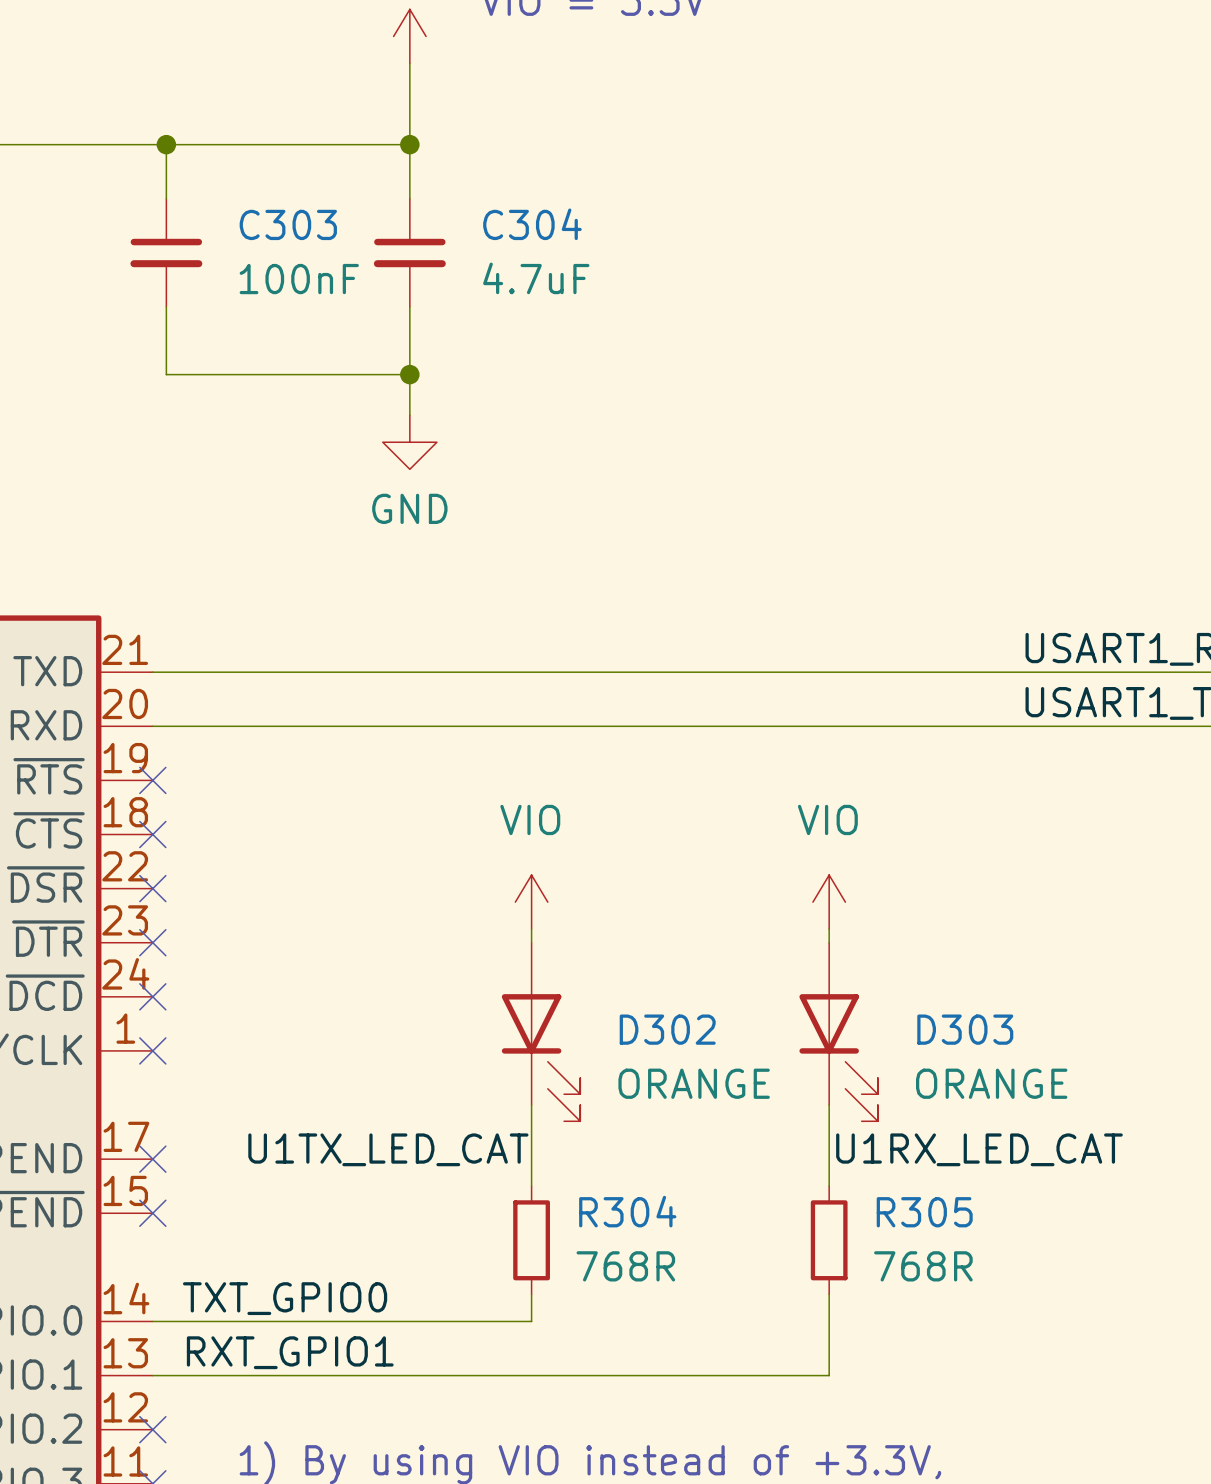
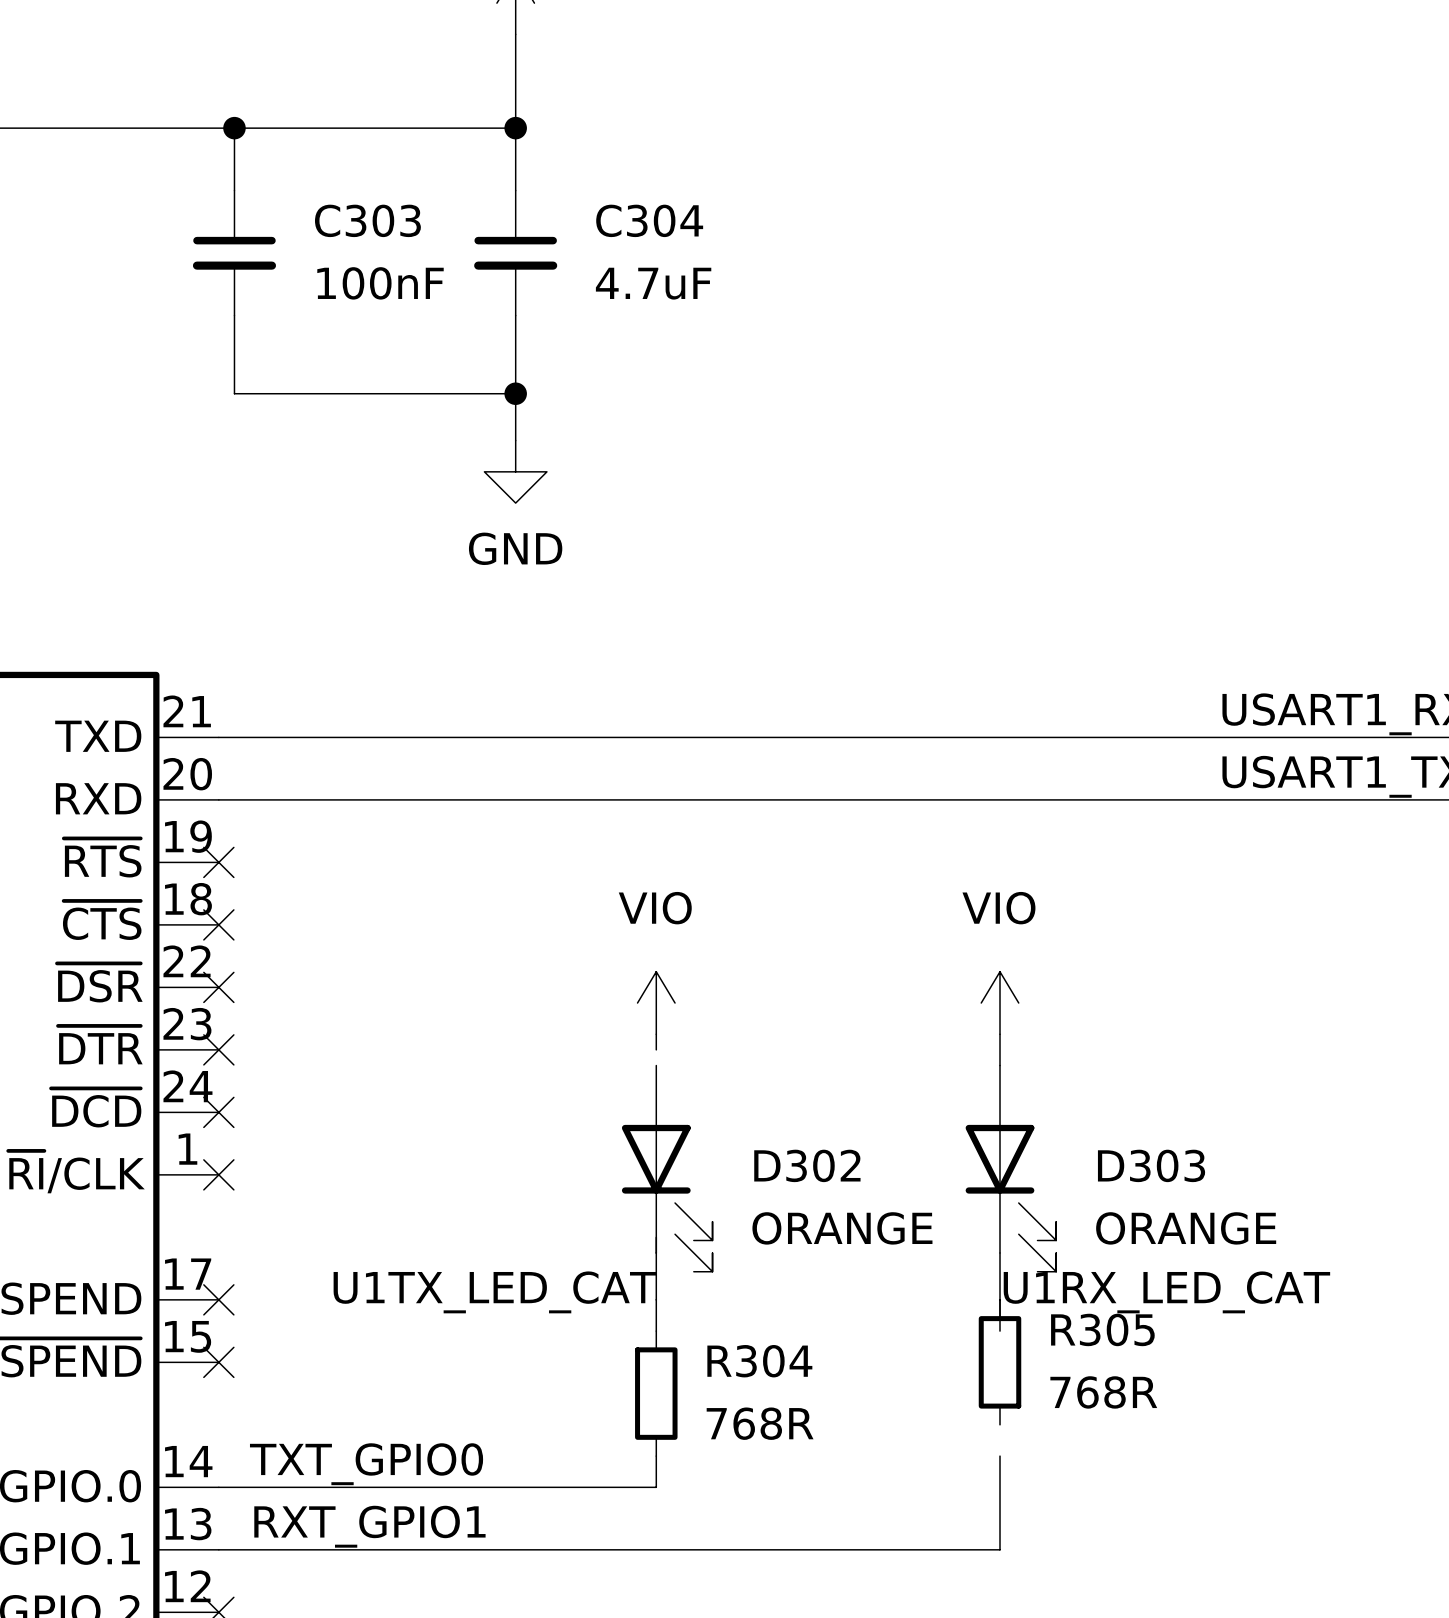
D302 position: (541, 1032) -> (667, 1168)
D303 position: (838, 1032) -> (1010, 1168)
R305 position: (829, 1240) -> (1000, 1362)

